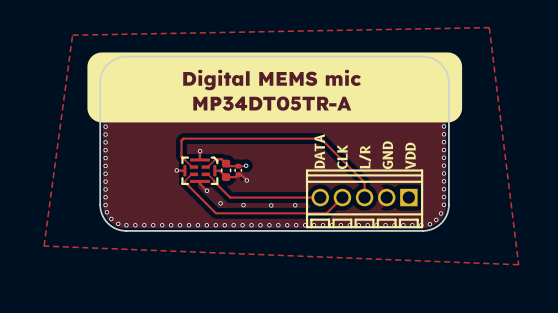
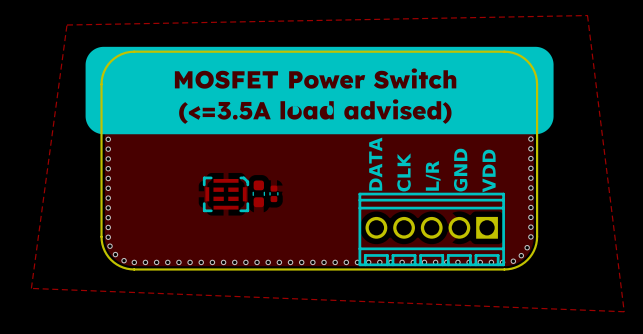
drawing shape: [87, 52, 463, 123] -> [85, 46, 554, 135]
drawing: none -> [200, 75, 209, 85]
drawing: [187, 75, 193, 83] -> none
drawing: [207, 78, 213, 83] -> none
drawing: [235, 78, 240, 83] -> none
drawing: none -> [308, 78, 315, 85]
drawing: none -> [344, 78, 349, 81]
drawing: [320, 99, 325, 104] -> none
drawing position: (215, 101) -> (295, 77)
drawing: [239, 102, 242, 105] -> none
drawing: none -> [417, 109, 437, 116]
drawing: none -> [307, 109, 313, 116]
drawing: none -> [348, 109, 371, 116]
drawing position: (344, 103) -> (261, 110)
track: (200, 151) (199, 159) -> none
via: (200, 151) -> none
track: (246, 165) (228, 166) (221, 159) (215, 159) (205, 167) -> none
via: (246, 165) -> none
track: (193, 167) (181, 156) (181, 140) (183, 138) (320, 138) (364, 182) (364, 197) -> none
track: (176, 170) (184, 170) -> none
via: (176, 170) -> none
track: (214, 170) (219, 170) (226, 177) (235, 177) (238, 174) -> none
track: (193, 174) (184, 181) (216, 213) (326, 213) (342, 197) -> none
track: (205, 174) (207, 174) (230, 197) (320, 197) -> none
track: (238, 174) (240, 174) (246, 180) -> none
via: (246, 180) -> none
track: (199, 181) (207, 190) -> none
via: (207, 190) -> none
via: (220, 203) -> none
via: (243, 205) -> none
via: (271, 205) -> none
via: (295, 205) -> none

